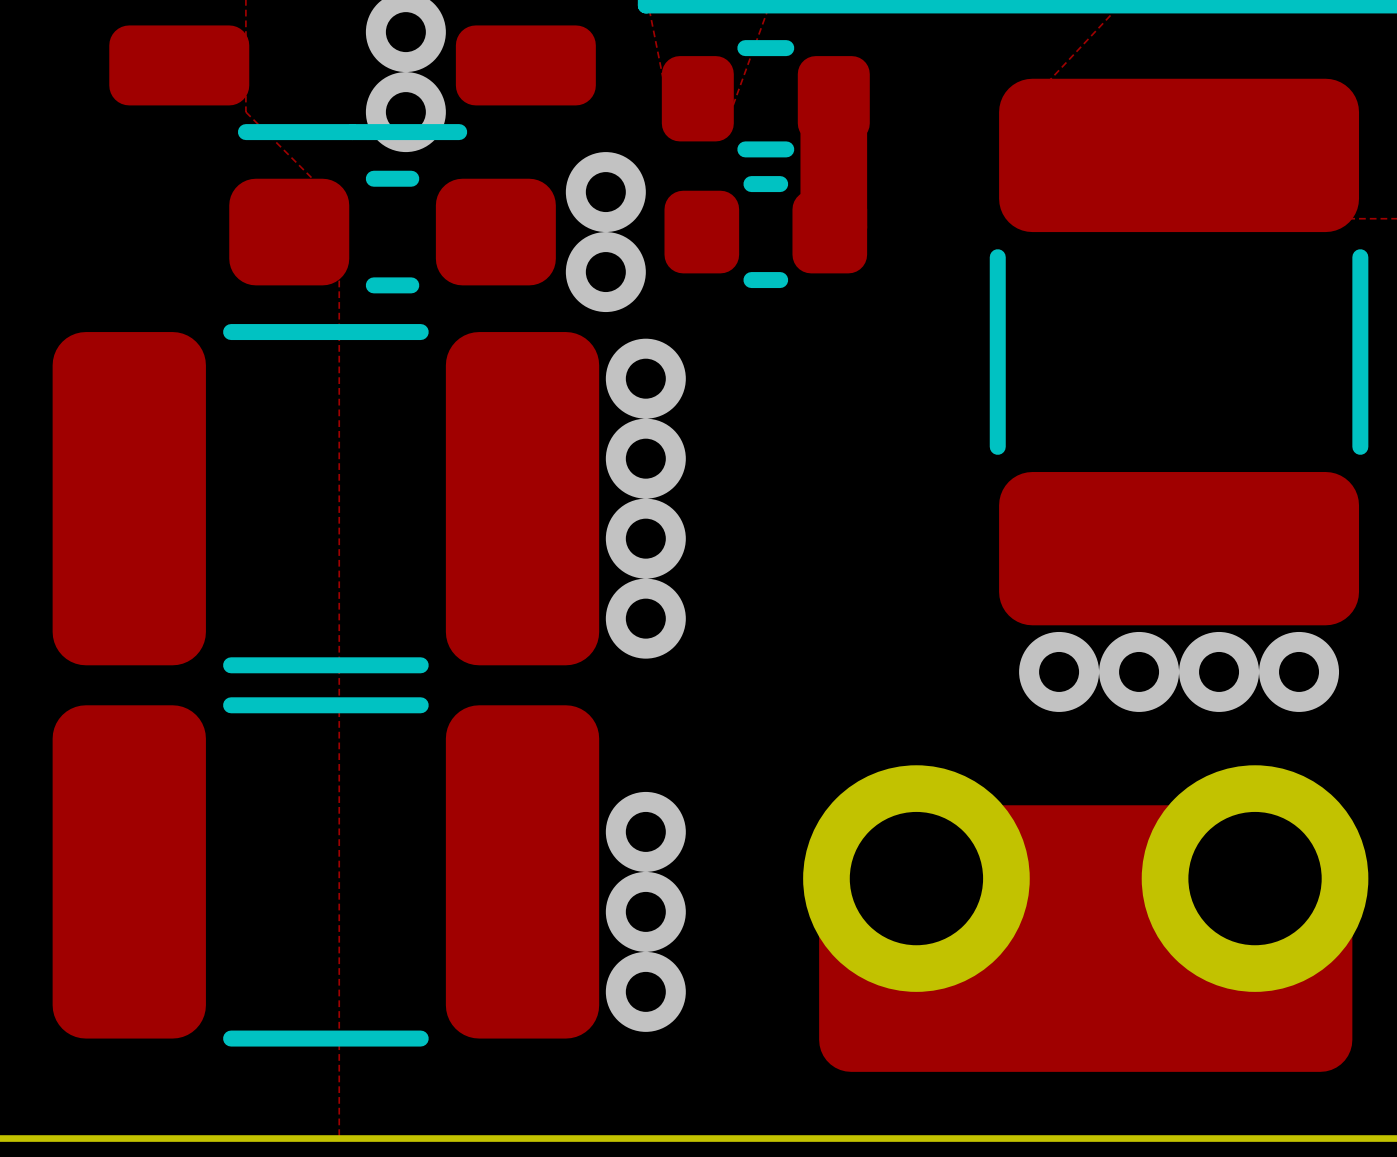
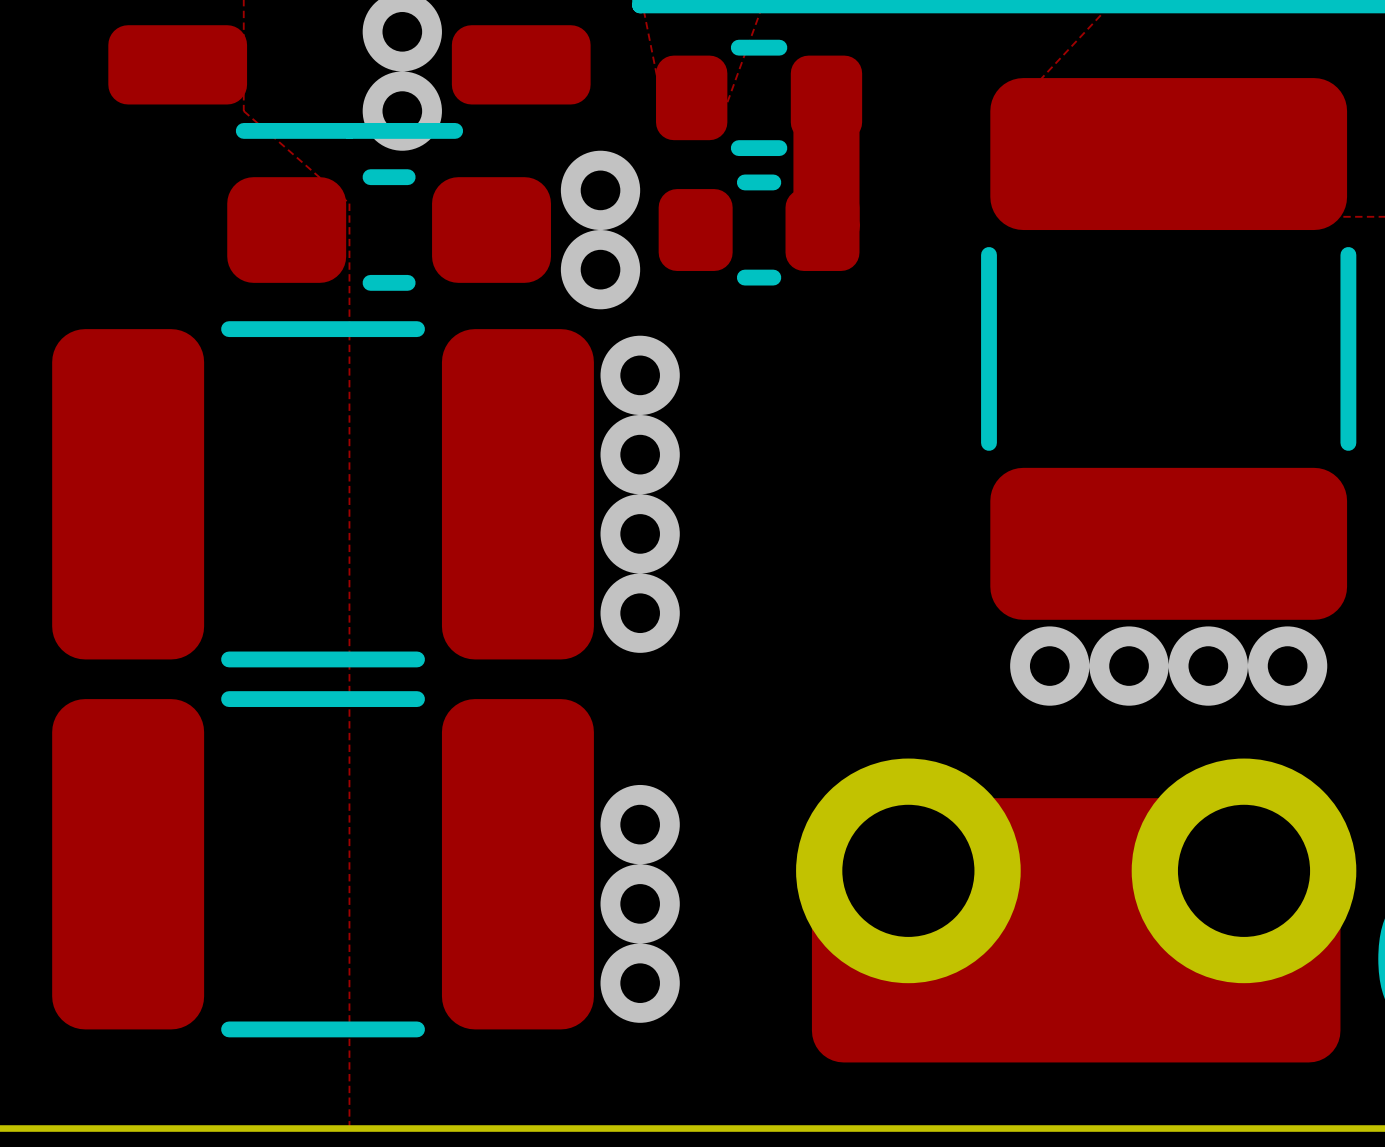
zone outline: (245, 112) (339, 205) (339, 1138) -> (243, 111) (349, 203) (349, 1128)

